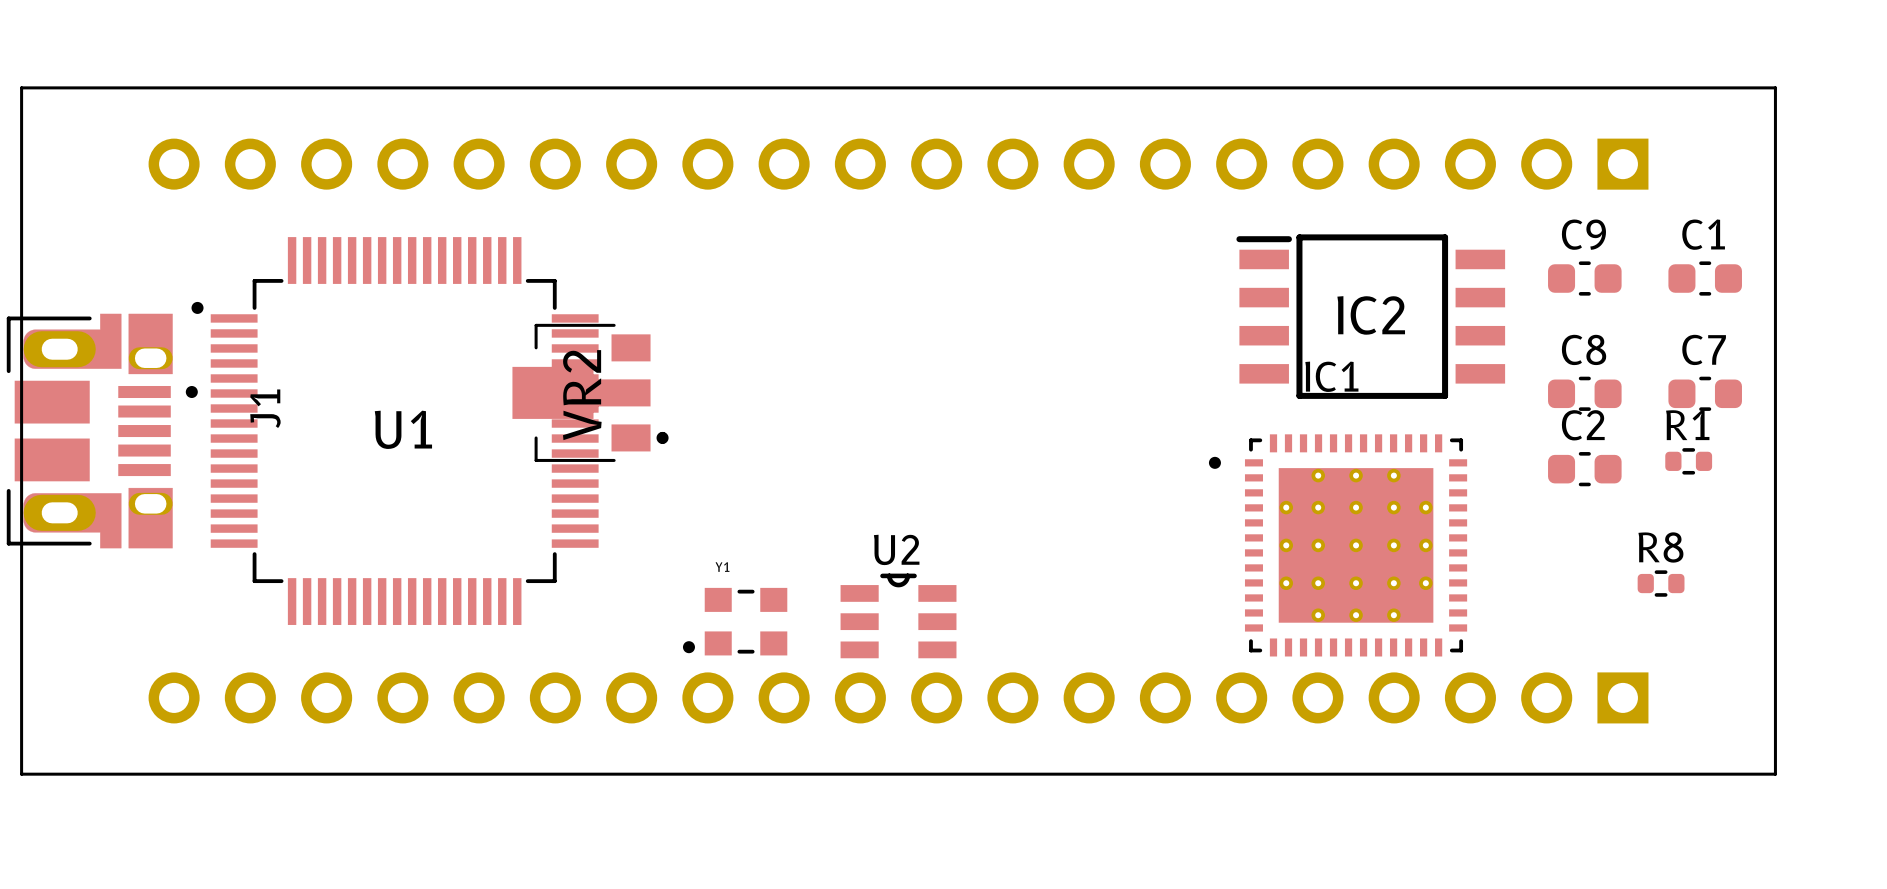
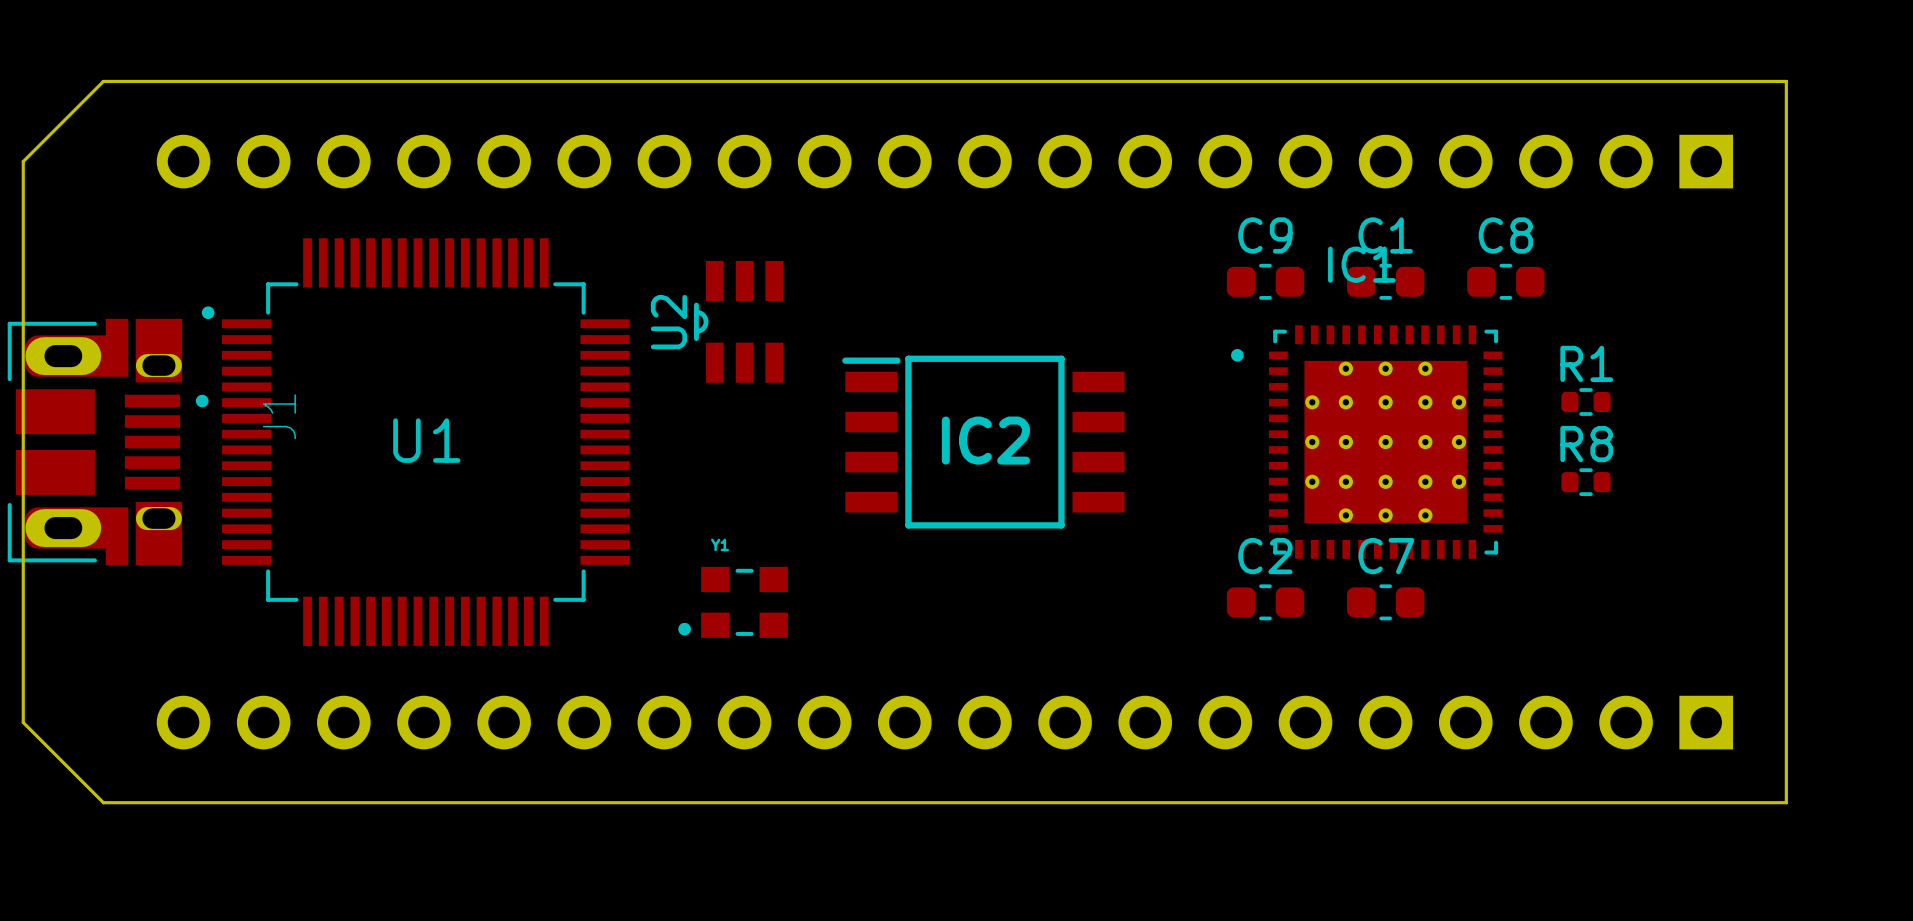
board edge: (97, 87) (21, 87) (21, 164) -> (103, 81) (23, 161)
board edge: (1699, 87) (1775, 87) (1775, 774) (1699, 774) -> (1786, 81) (1786, 802)
C9 position: (1584, 278) -> (1265, 281)
C1 position: (1705, 278) -> (1385, 281)
IC2 position: (1370, 316) -> (983, 442)
VR2: (590, 392) -> none
C8 position: (1584, 393) -> (1505, 281)
C7 position: (1705, 393) -> (1385, 602)
R1 position: (1688, 461) -> (1585, 402)
C2 position: (1584, 469) -> (1265, 602)
IC1 position: (1338, 545) -> (1366, 442)
R8 position: (1661, 583) -> (1585, 482)
U2 rotation: 0° (898, 615) -> 90° counterclockwise (738, 321)
U2 position: (898, 615) -> (738, 321)
Y1 position: (735, 621) -> (733, 602)
board edge: (21, 697) (21, 774) (97, 774) -> (23, 722) (103, 802)

